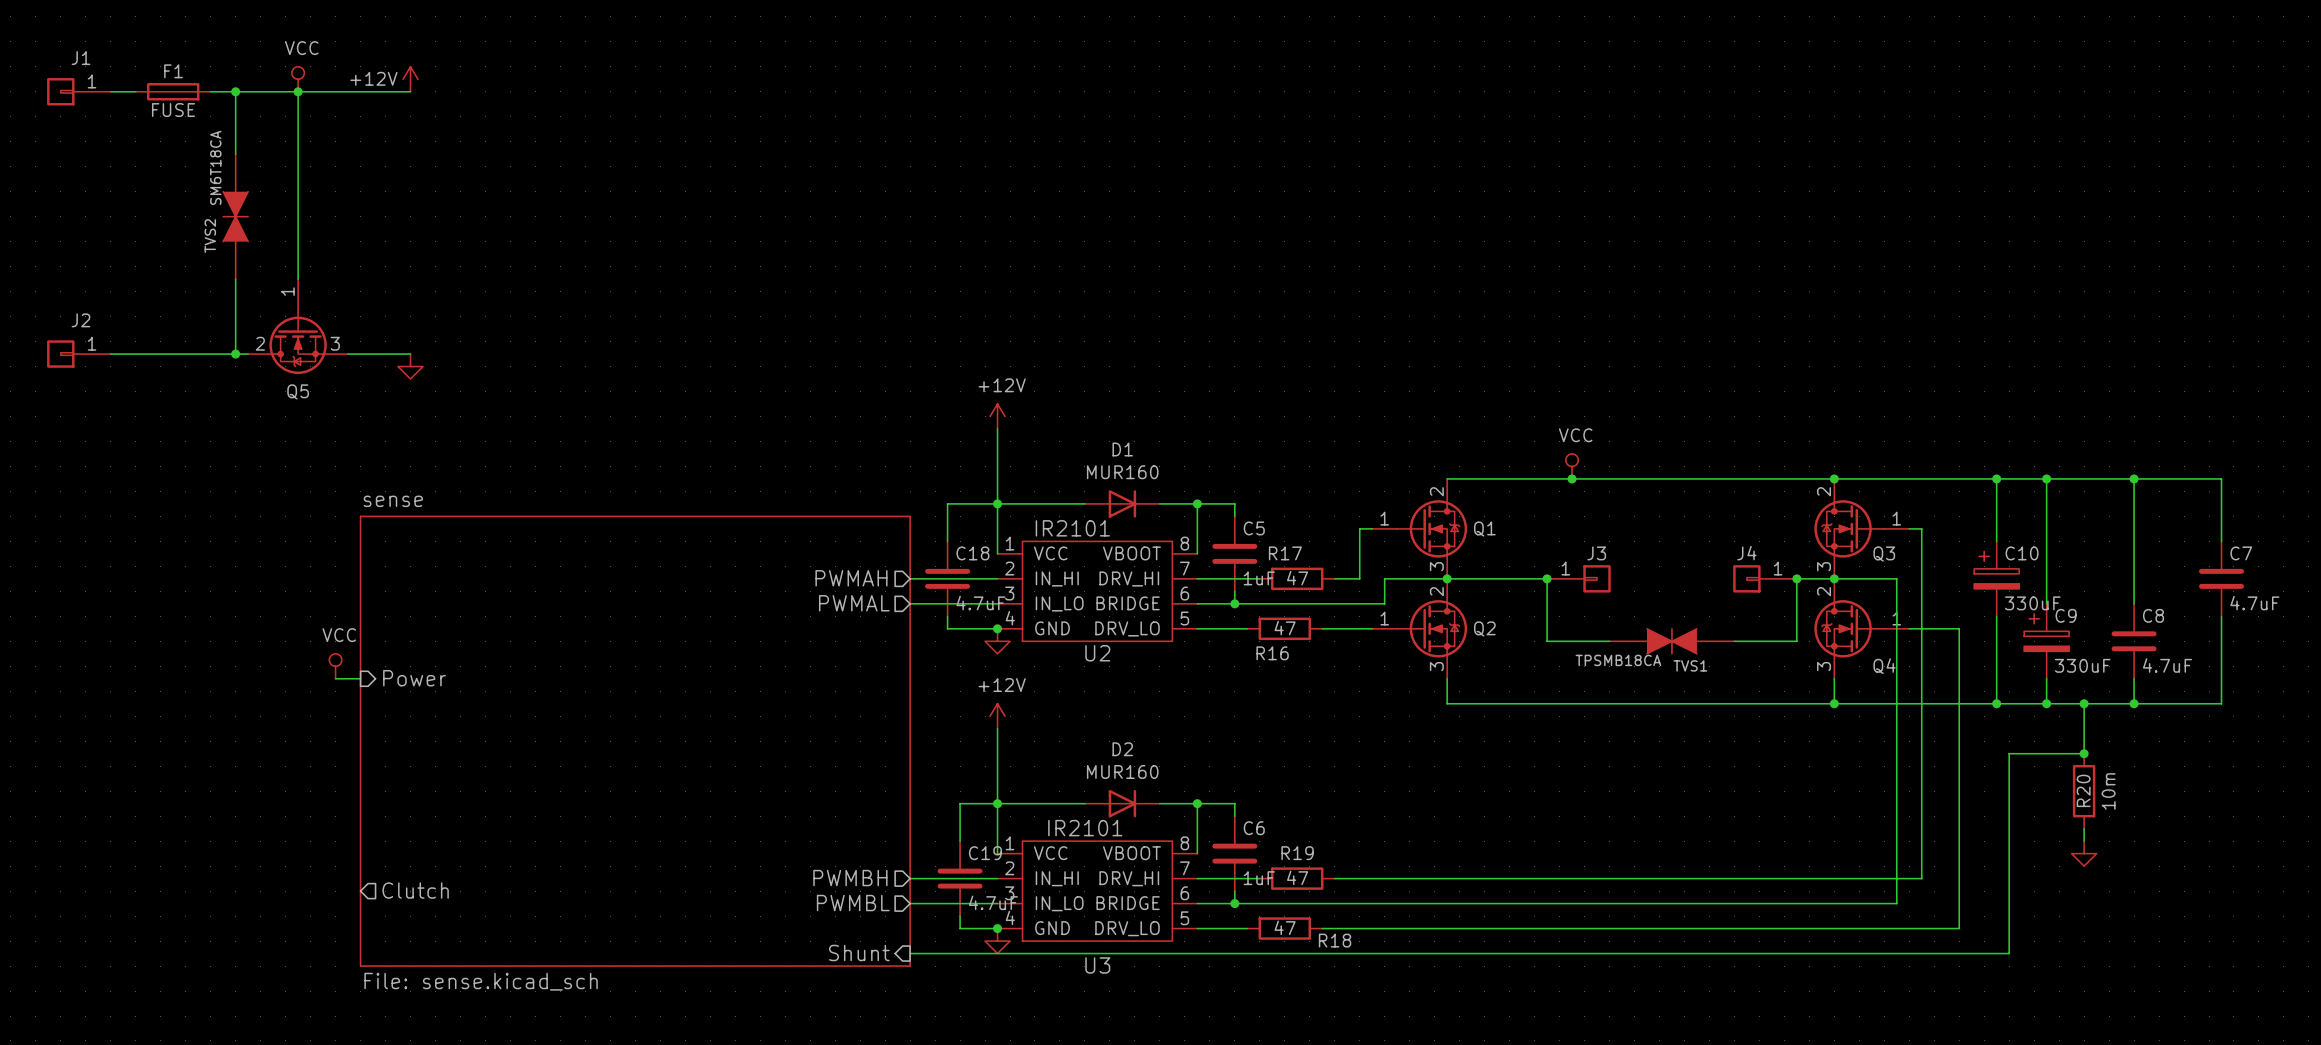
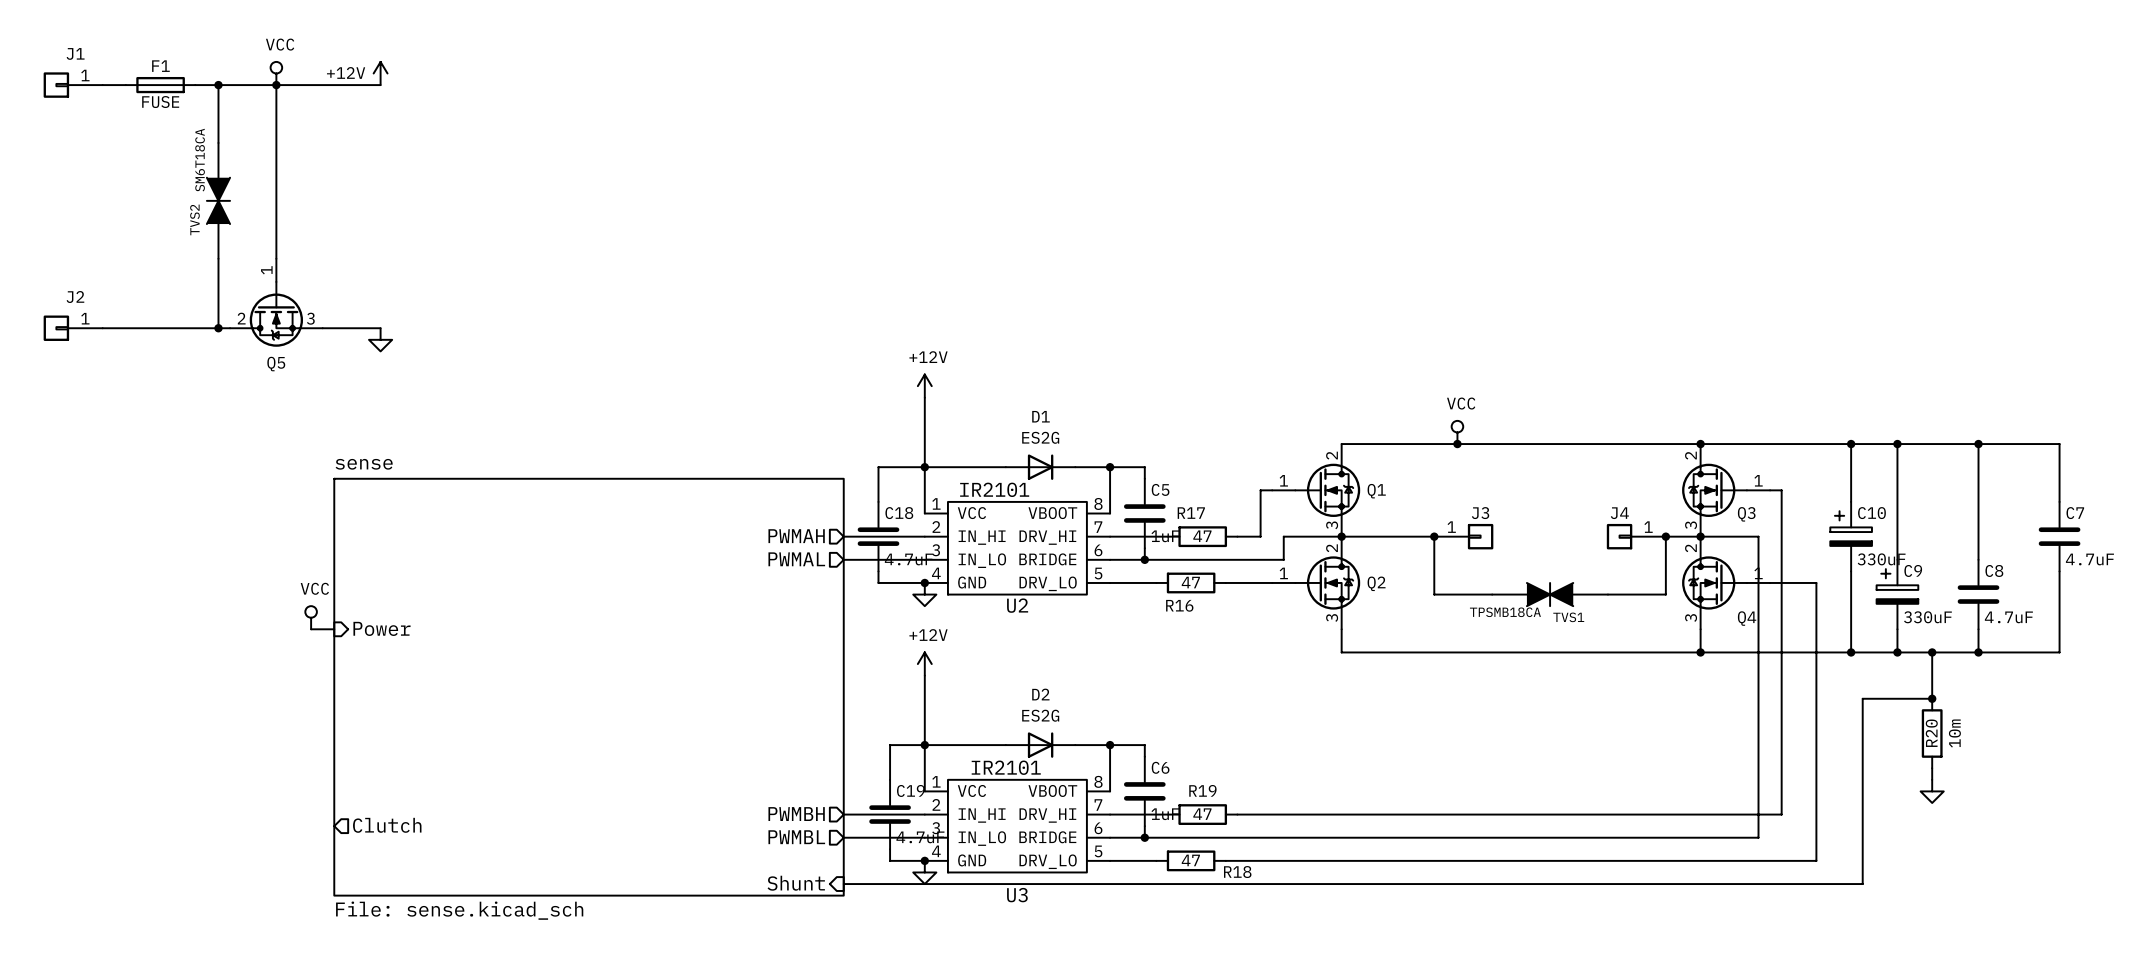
D1 value: MUR160 (1122, 472) -> ES2G (1040, 437)
D2 value: MUR160 (1122, 771) -> ES2G (1040, 715)

